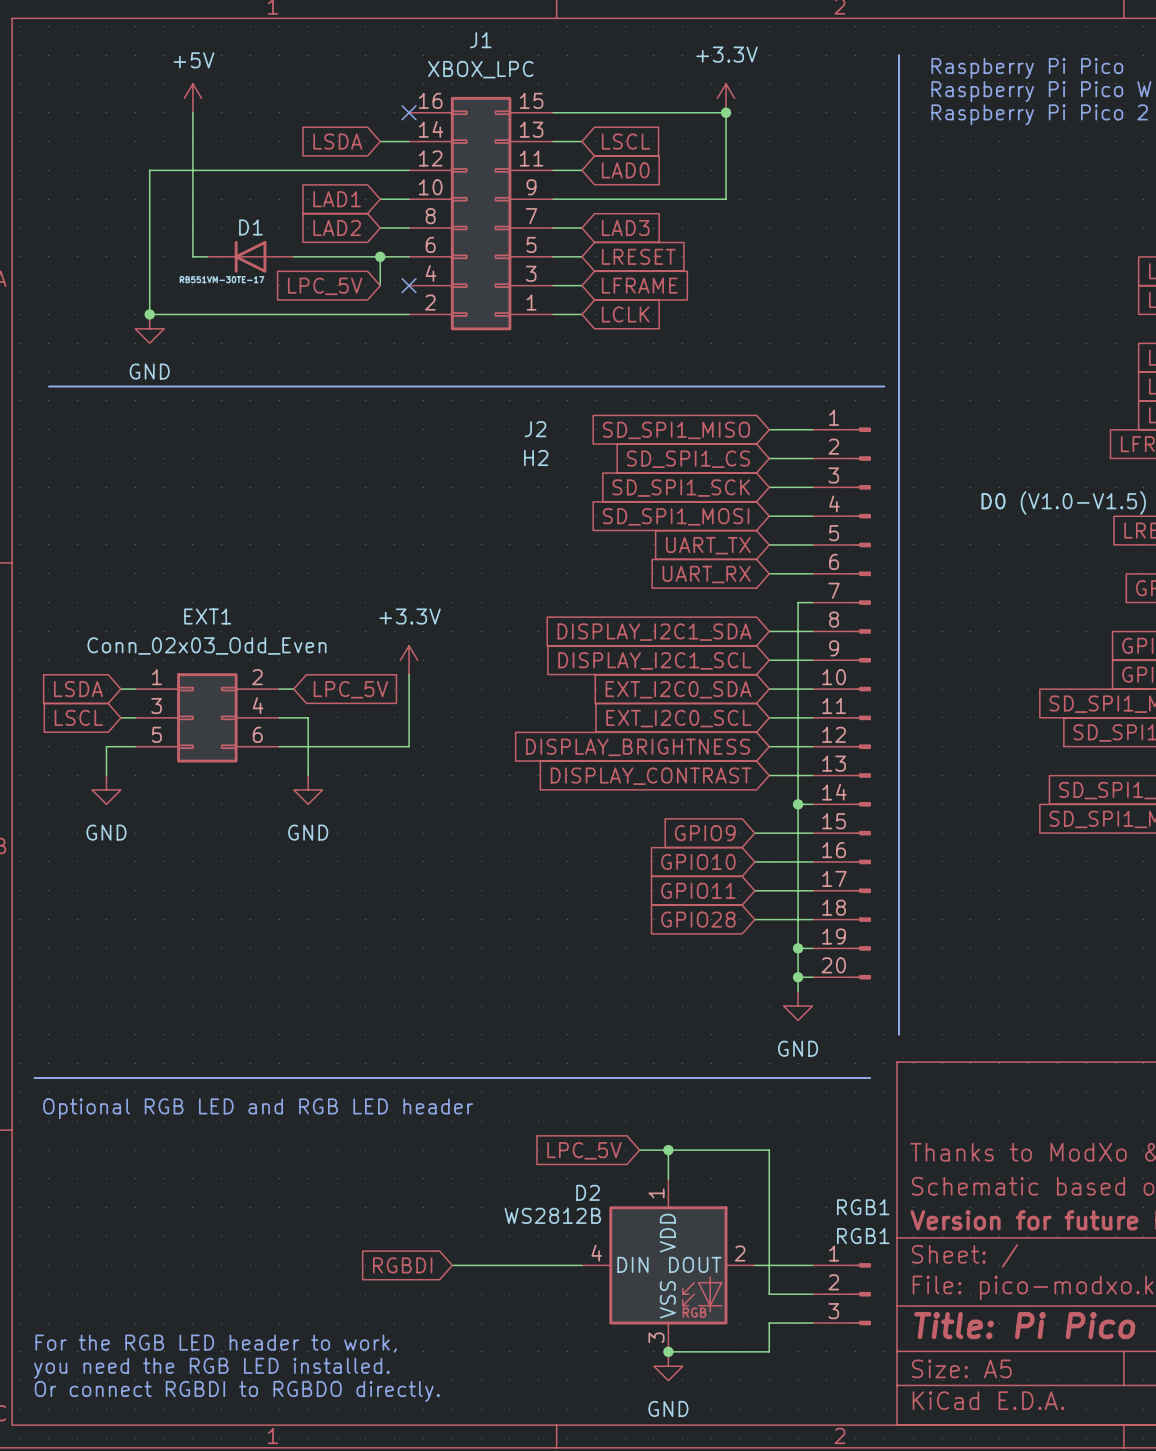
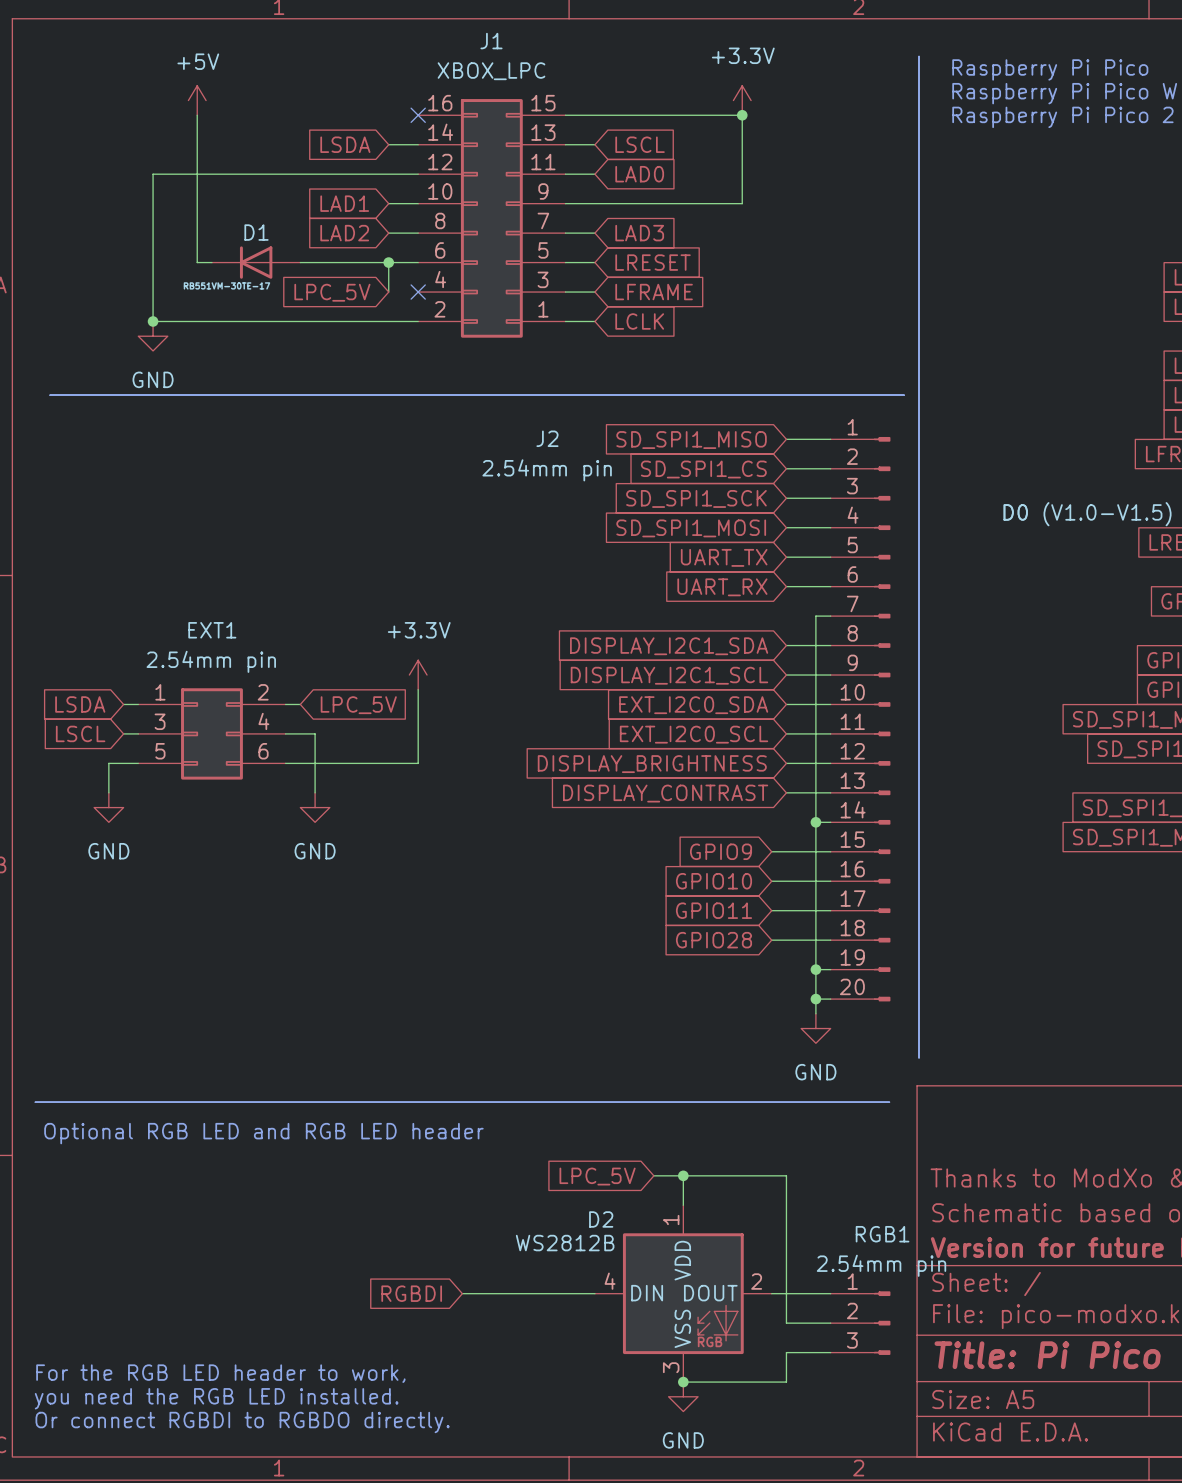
J2 value: H2 (536, 458) -> 2.54mm pin (547, 470)
EXT1 value: Conn_02x03_Odd_Even (206, 646) -> 2.54mm pin (211, 661)
RGB1 value: RGB1 (863, 1236) -> 2.54mm pin (881, 1265)

